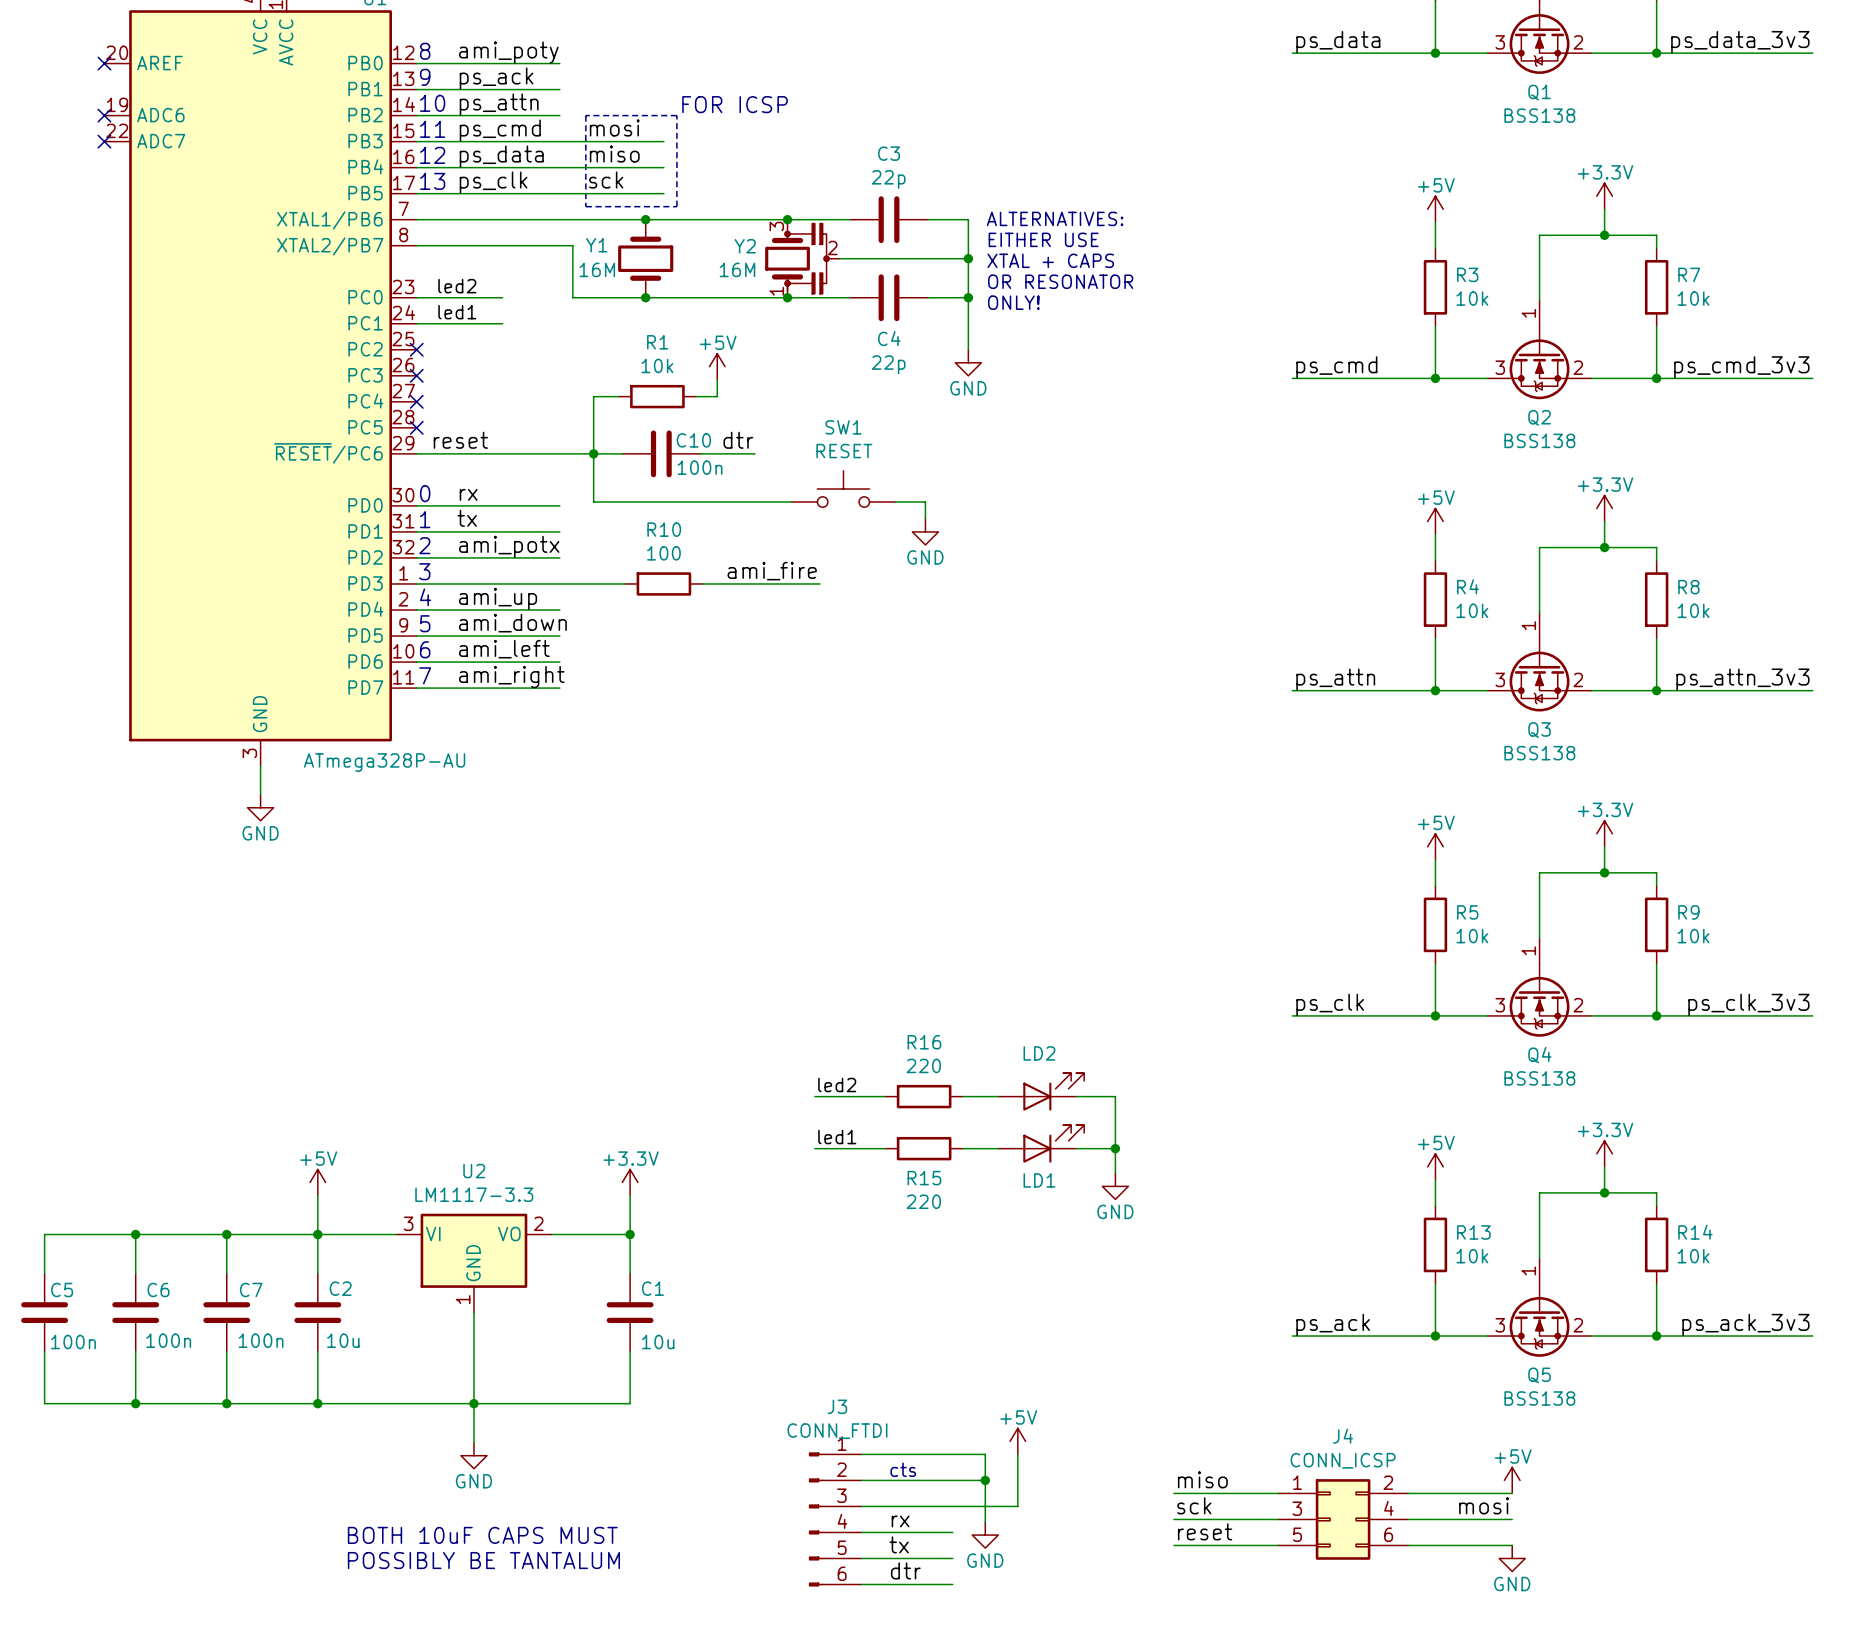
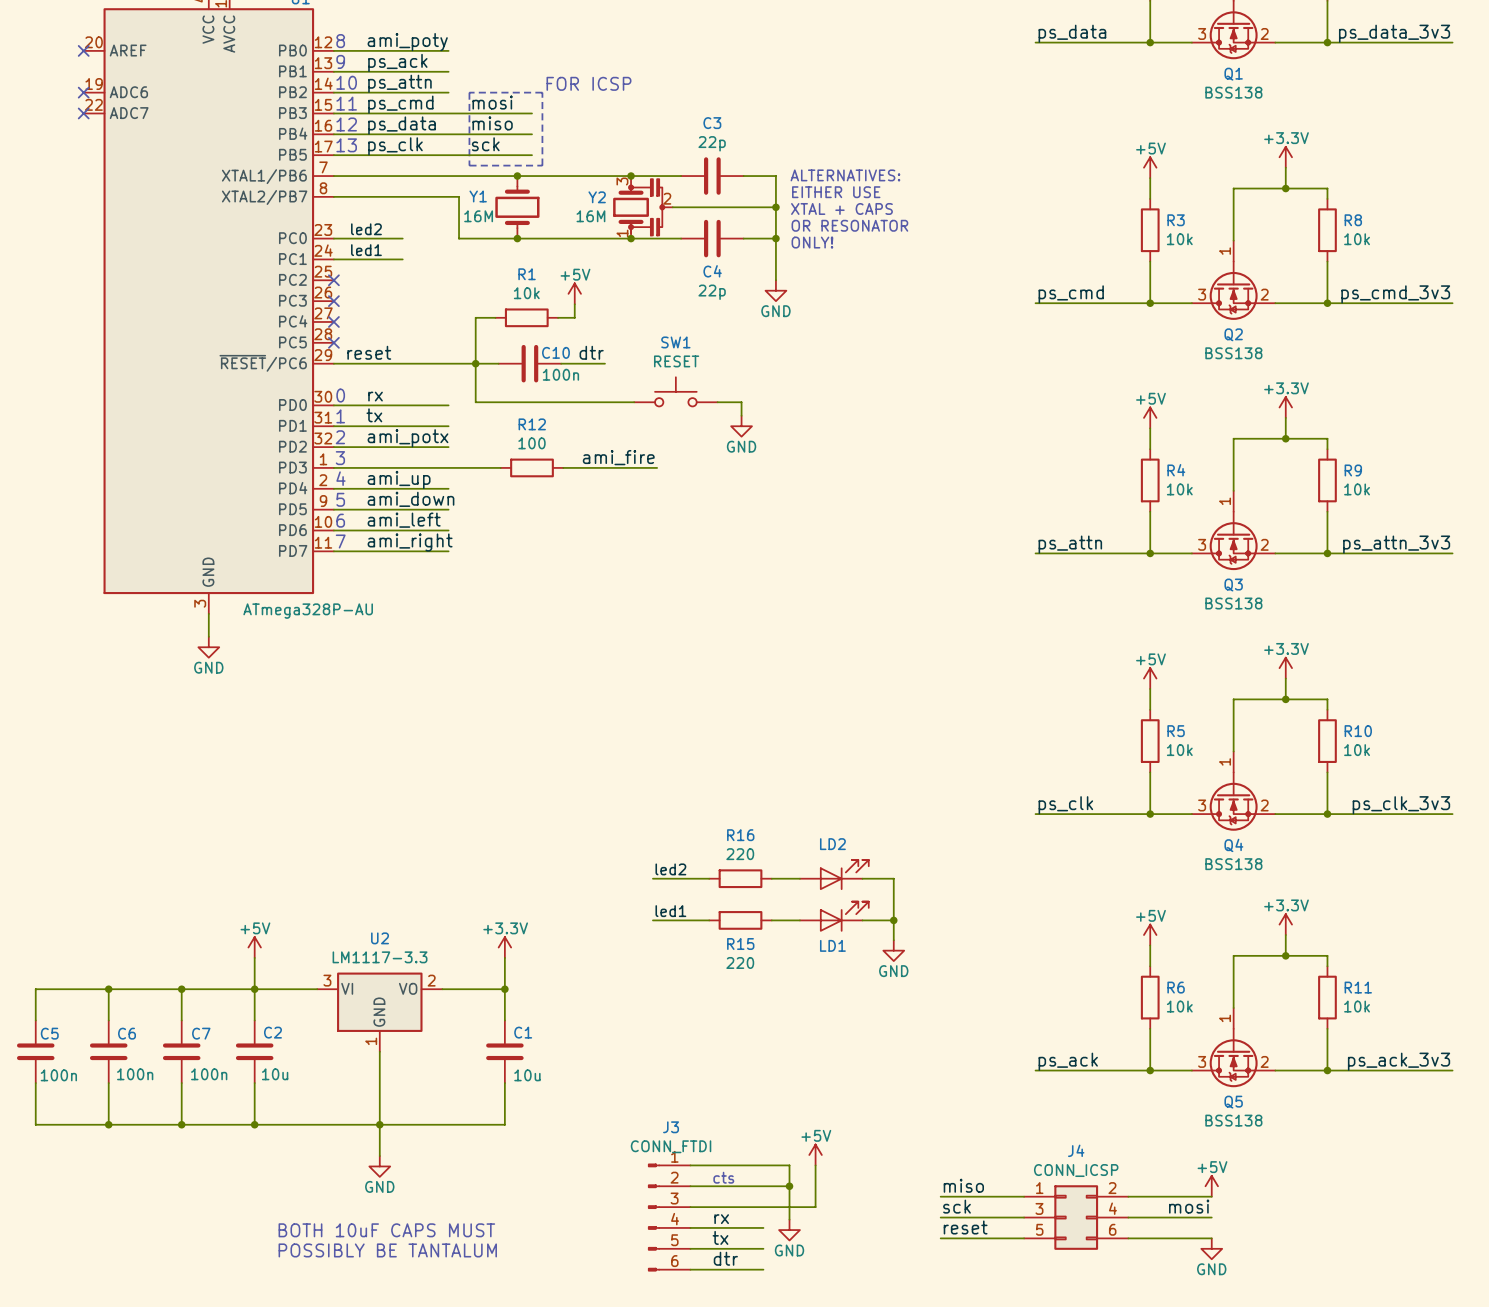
R7 name: R7 (1689, 274) -> R8 (1353, 220)
R10 name: R10 (664, 529) -> R12 (532, 424)
R8 name: R8 (1688, 587) -> R9 (1353, 470)
R9 name: R9 (1688, 912) -> R10 (1358, 731)
R13 name: R13 (1473, 1232) -> R6 (1176, 987)
R14 name: R14 (1695, 1232) -> R11 (1358, 987)

